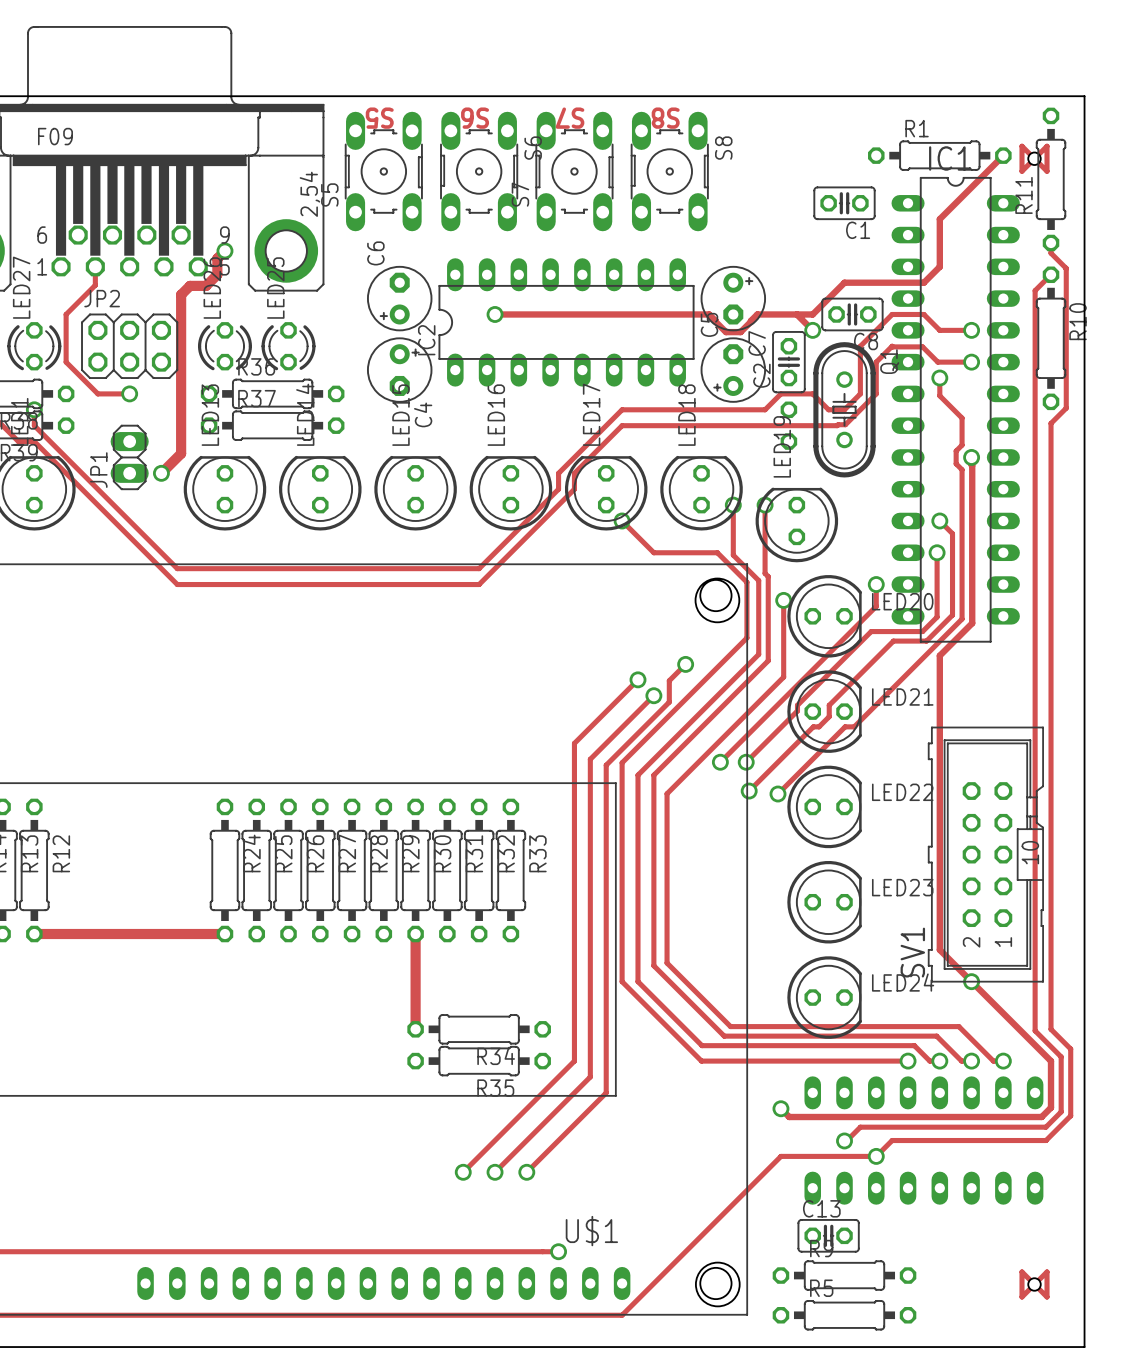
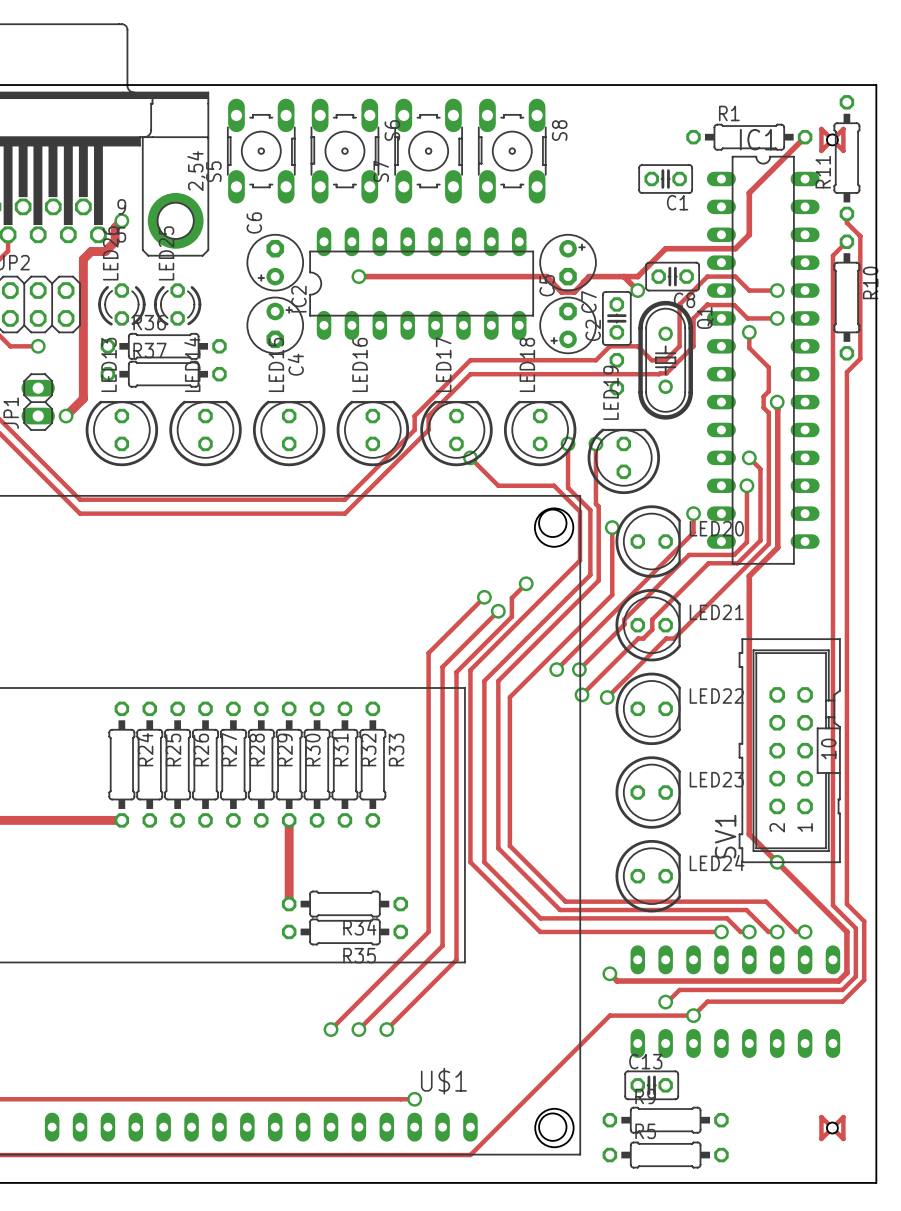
text: S5 (379, 118) -> none
text: S6 (475, 118) -> none
text: S7 (569, 118) -> none
text: S8 (665, 118) -> none

